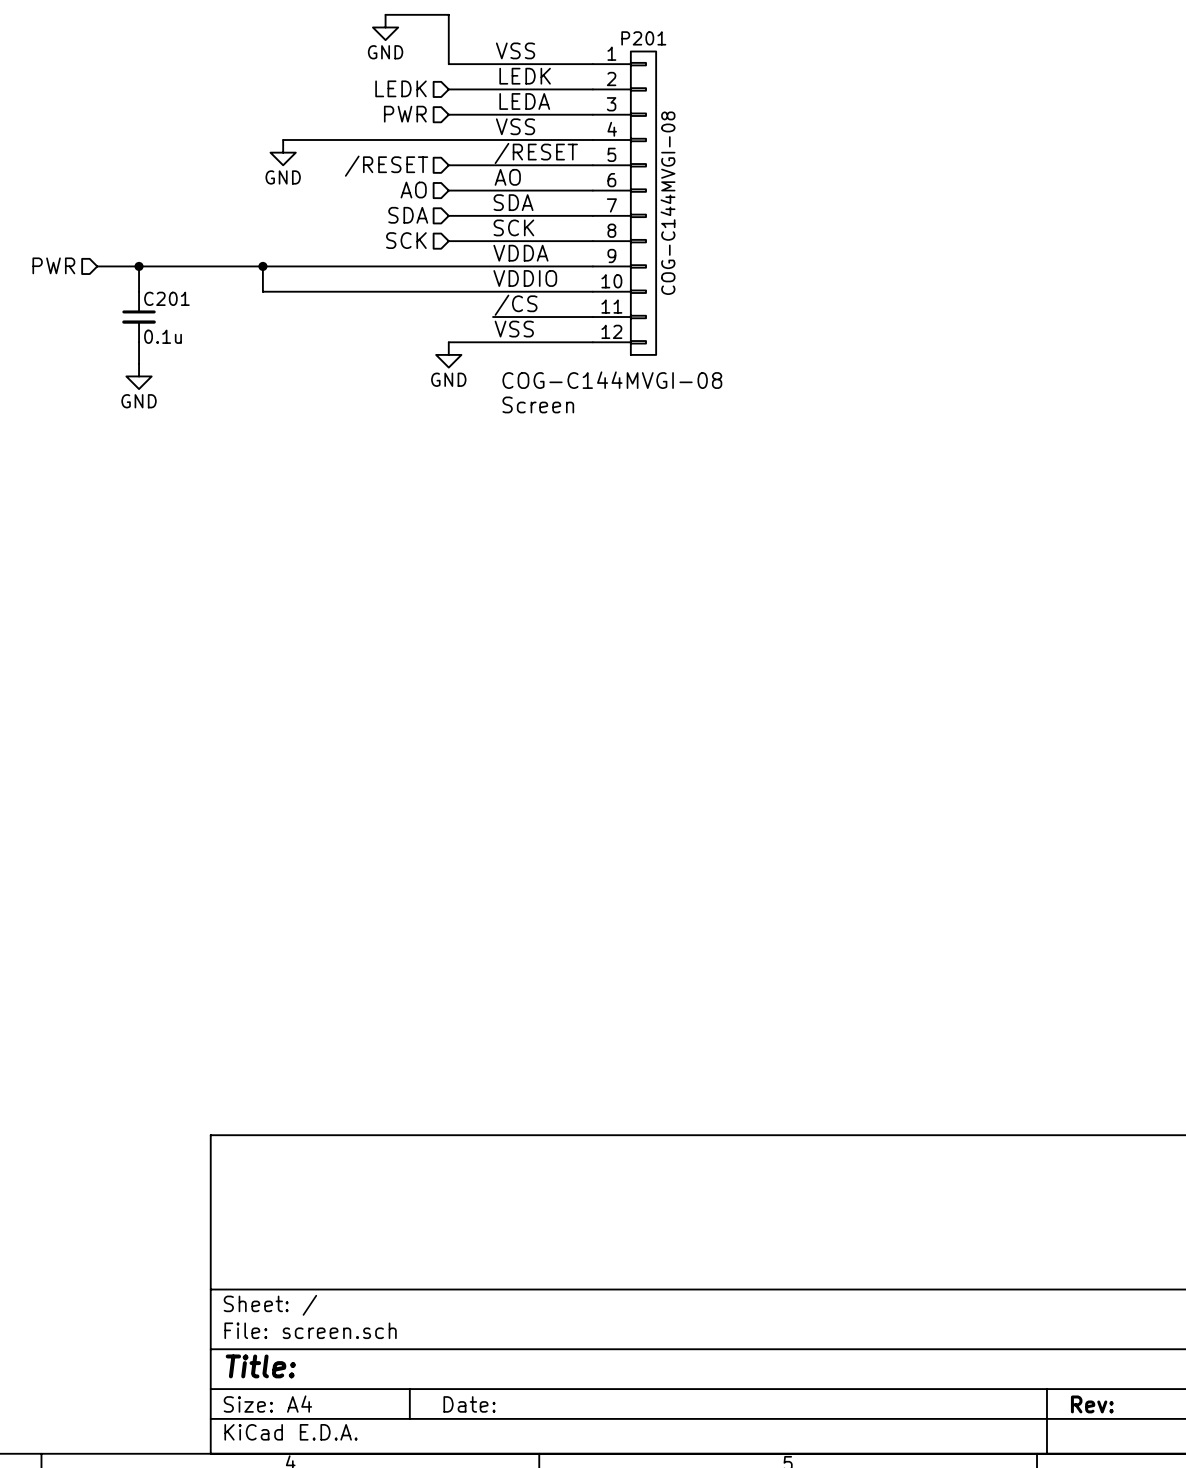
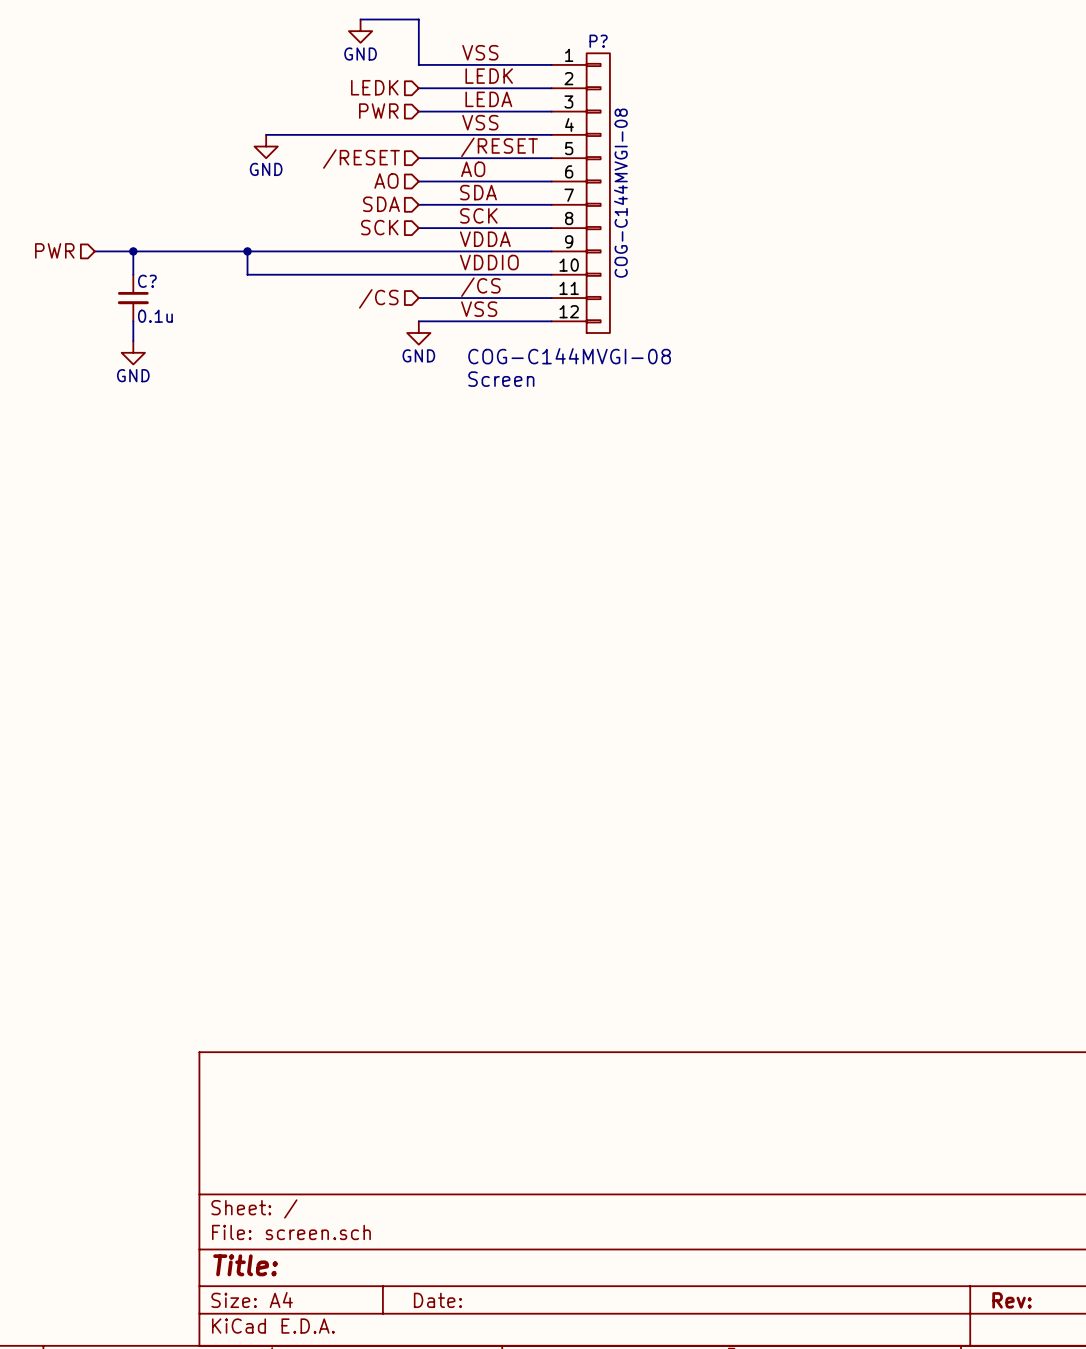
P201 name: P201 (643, 38) -> P? (598, 41)
C201 name: C201 (166, 298) -> C? (147, 281)
hierarchical label: none -> /CS (378, 298)
wire: none -> (418, 298) (459, 298)

